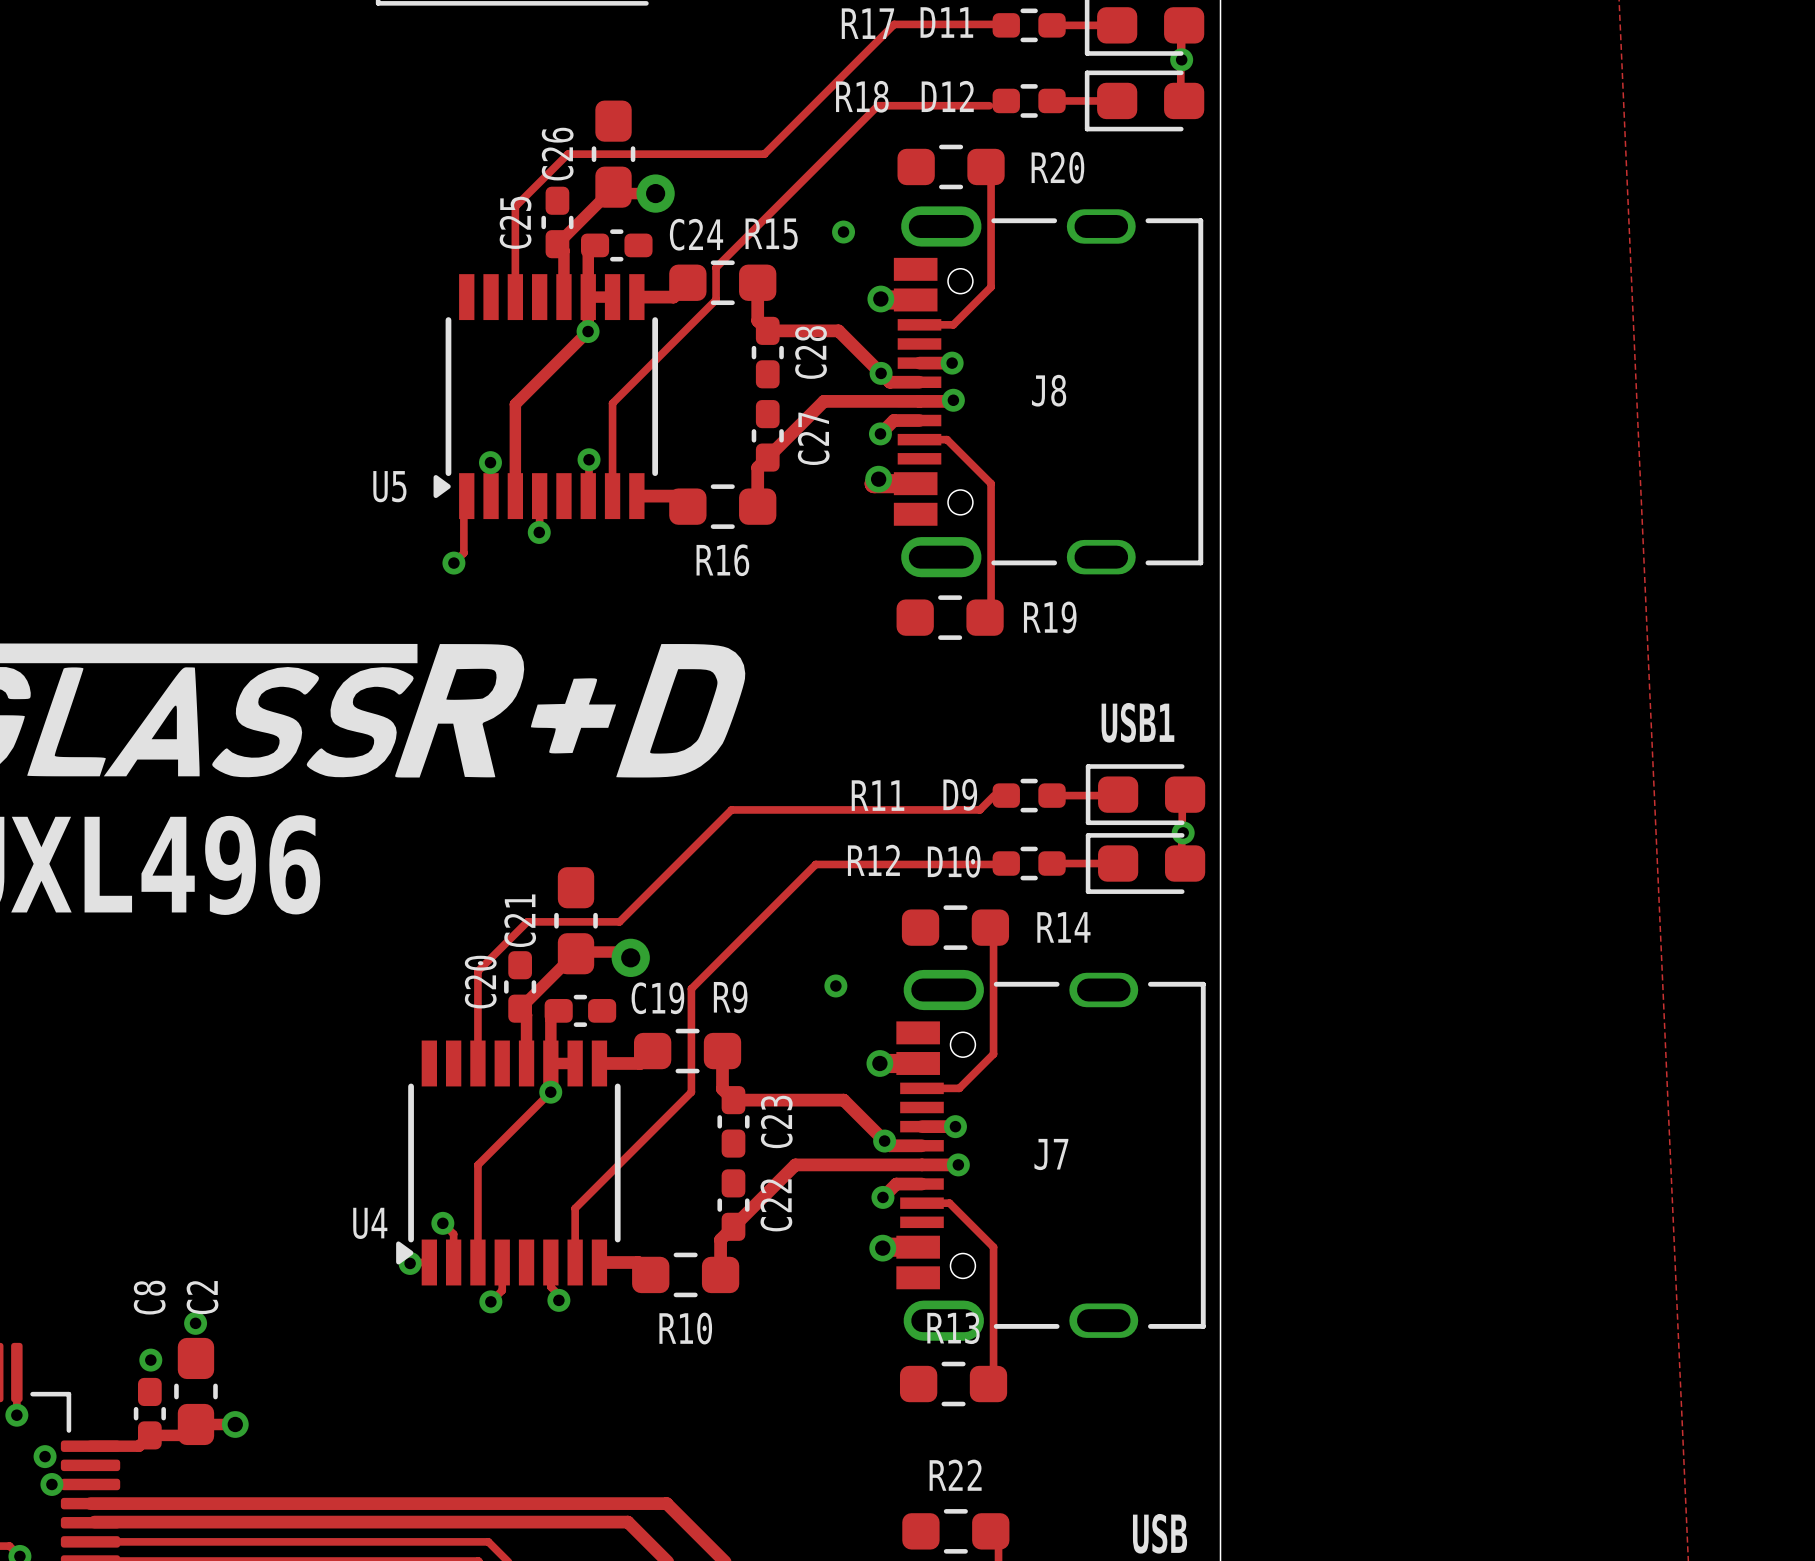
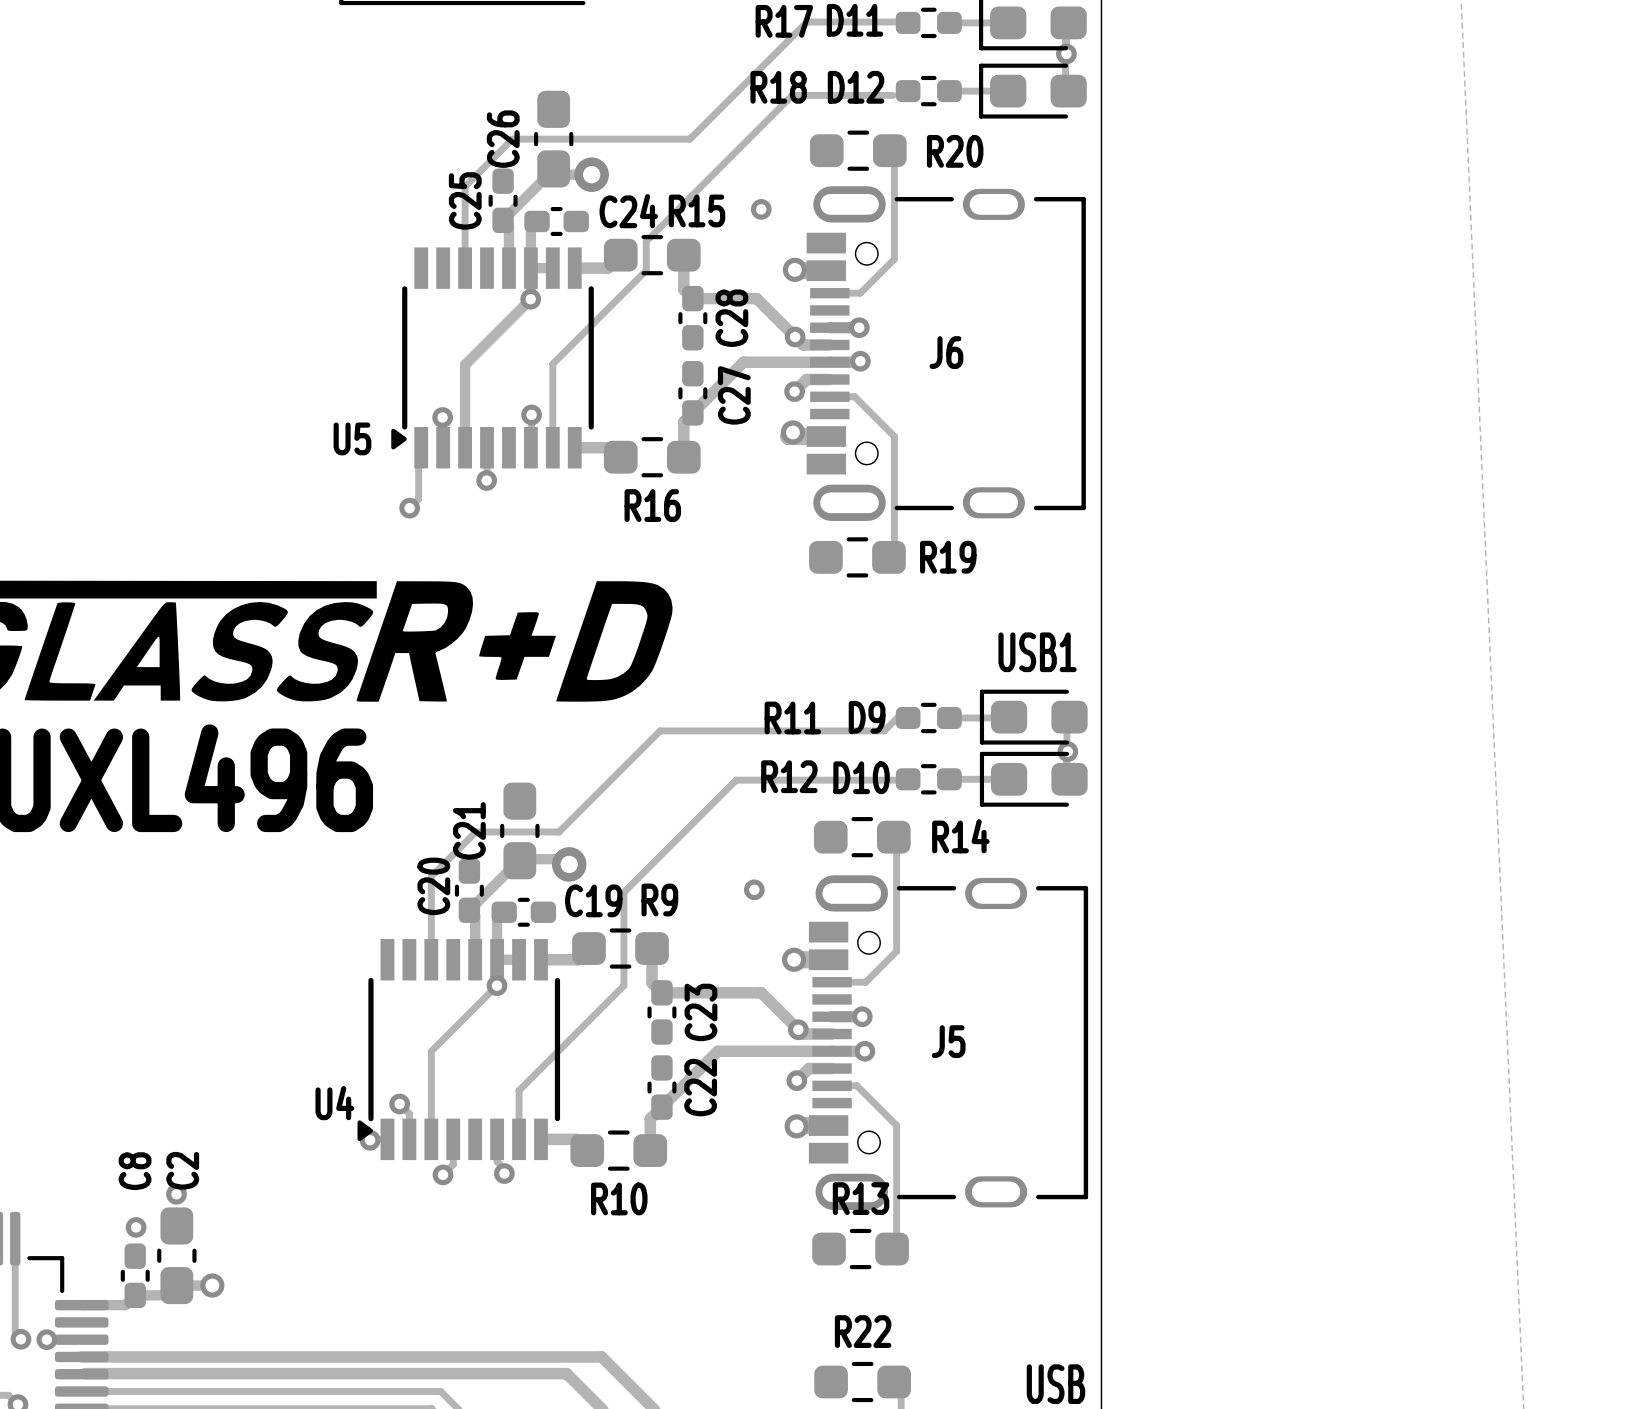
J8 name: J8 (1049, 390) -> J6 (946, 352)
J7 name: J7 (1051, 1154) -> J5 (948, 1041)
track: none -> (15, 1277) (15, 1333) (20, 1339)
via: (16, 1415) -> none
via: (45, 1456) -> none
via: none -> (20, 1339)

